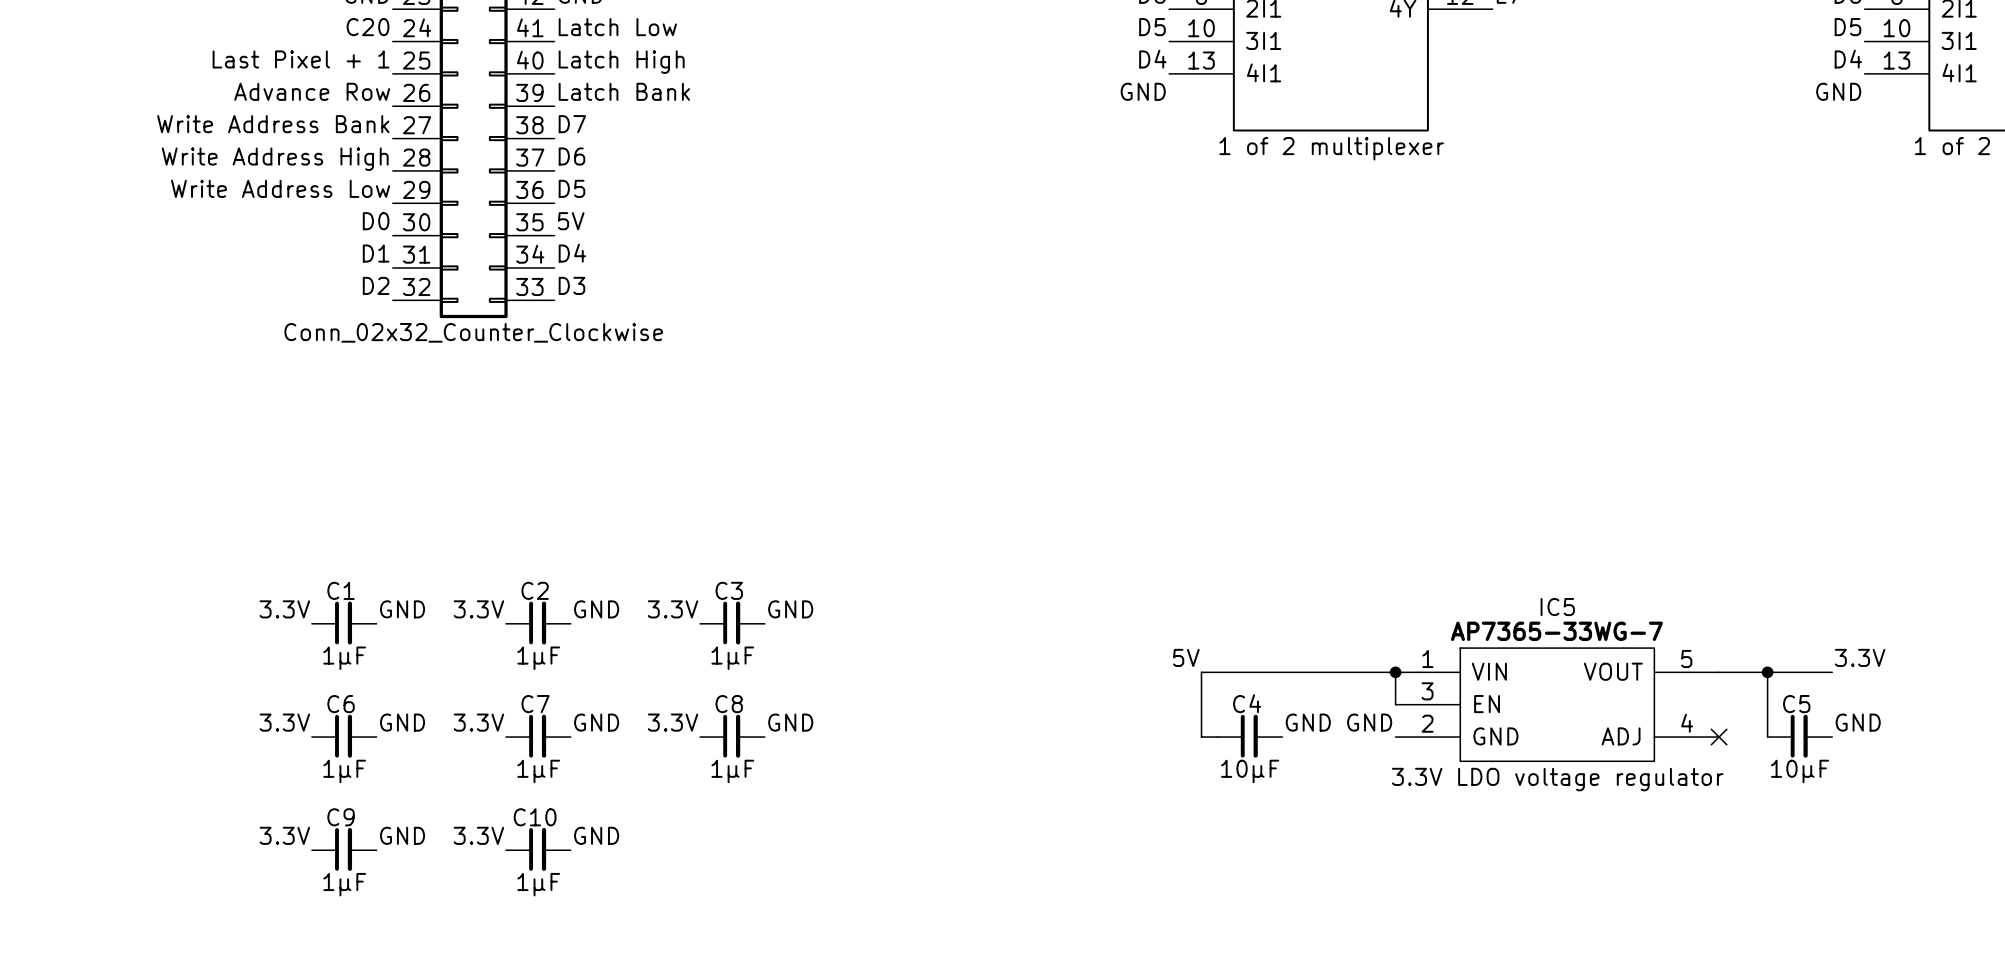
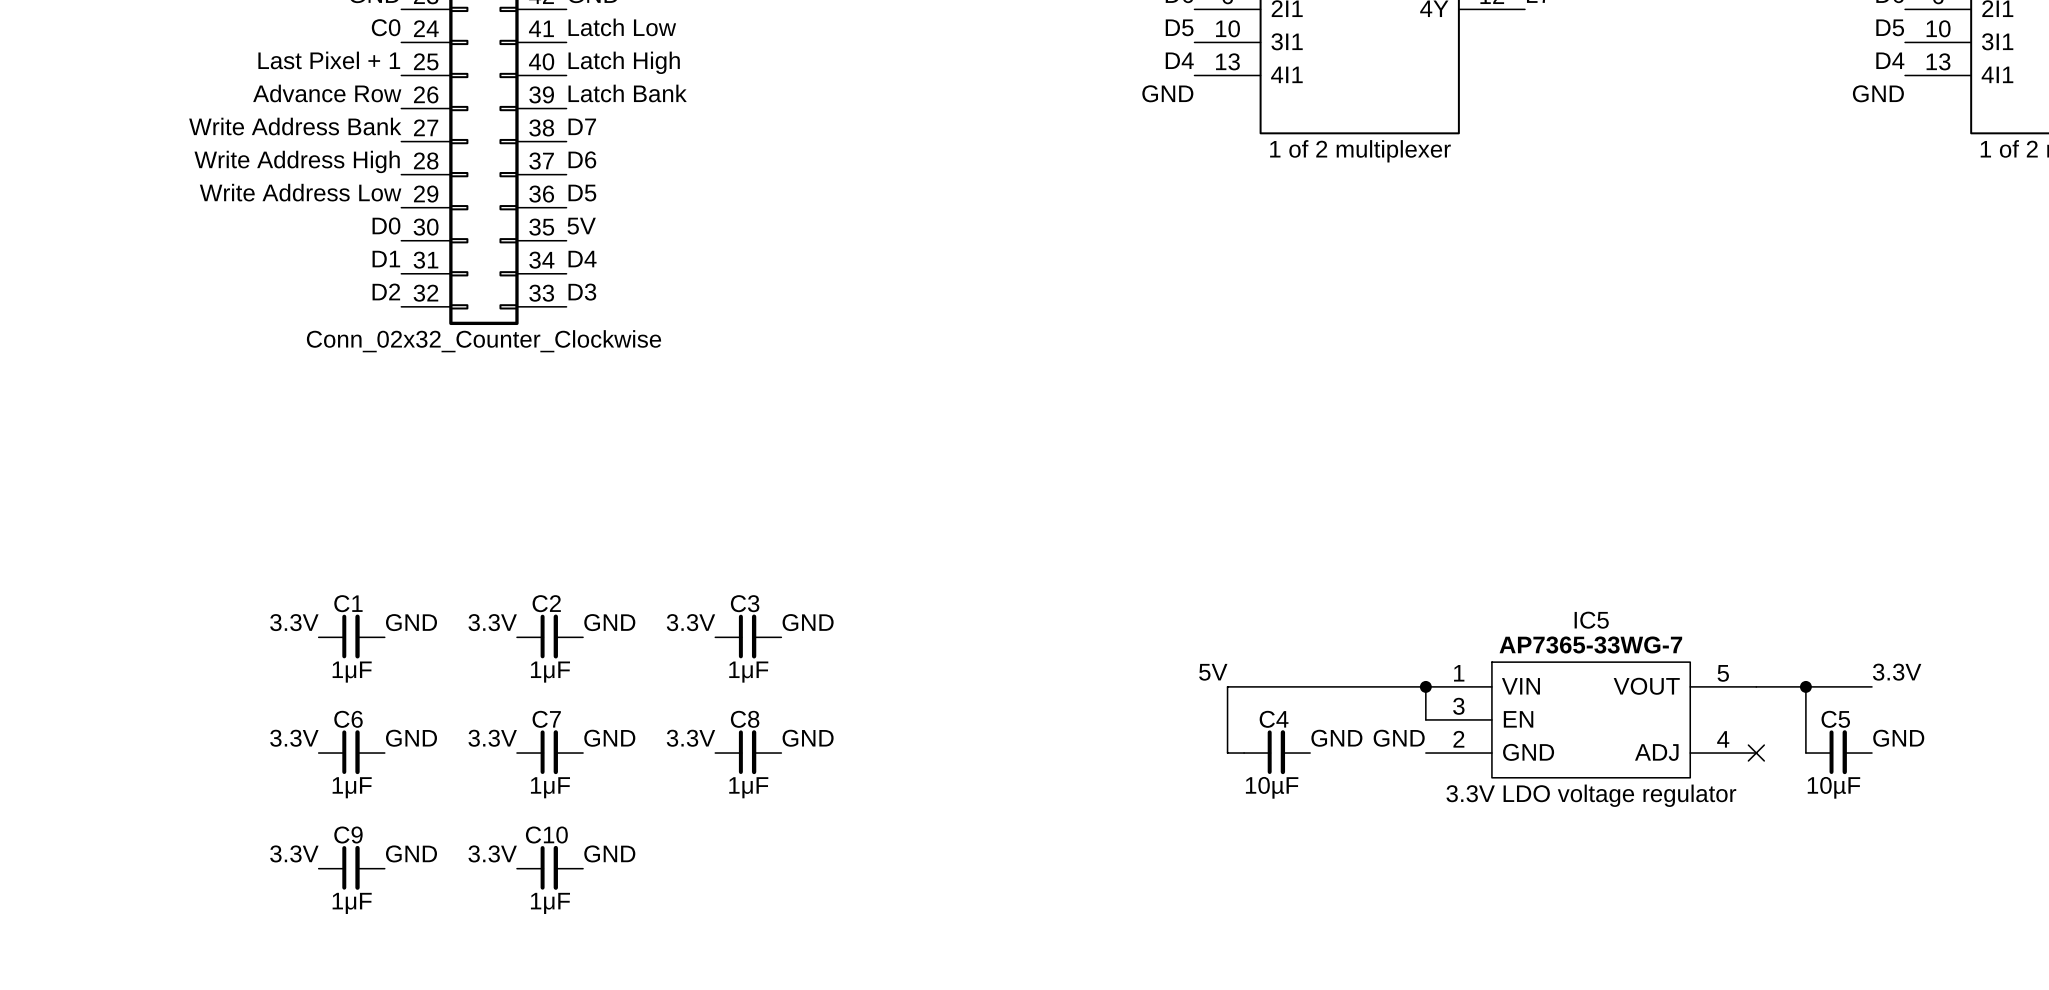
label: C20 (368, 27) -> C0 (386, 27)

